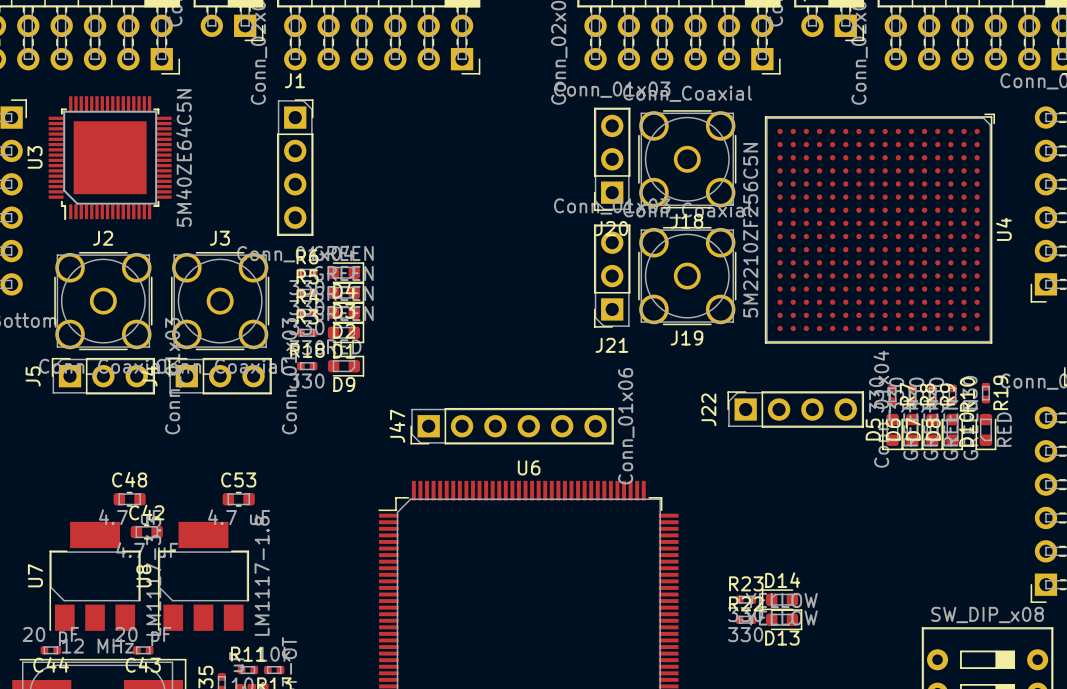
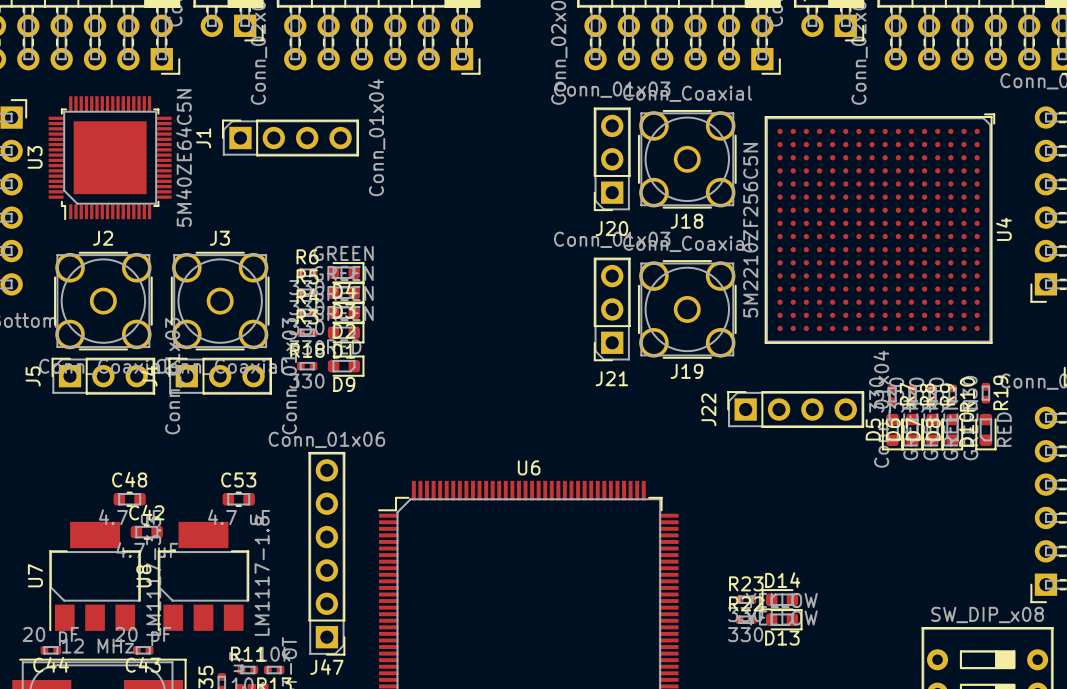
J1 rotation: 0° (295, 167) -> 90° counterclockwise (290, 138)
J21 position: (612, 276) -> (612, 309)
J19 position: (687, 276) -> (687, 309)
J47 rotation: 0° (512, 426) -> 90° counterclockwise (326, 553)
J47 position: (512, 426) -> (326, 553)

